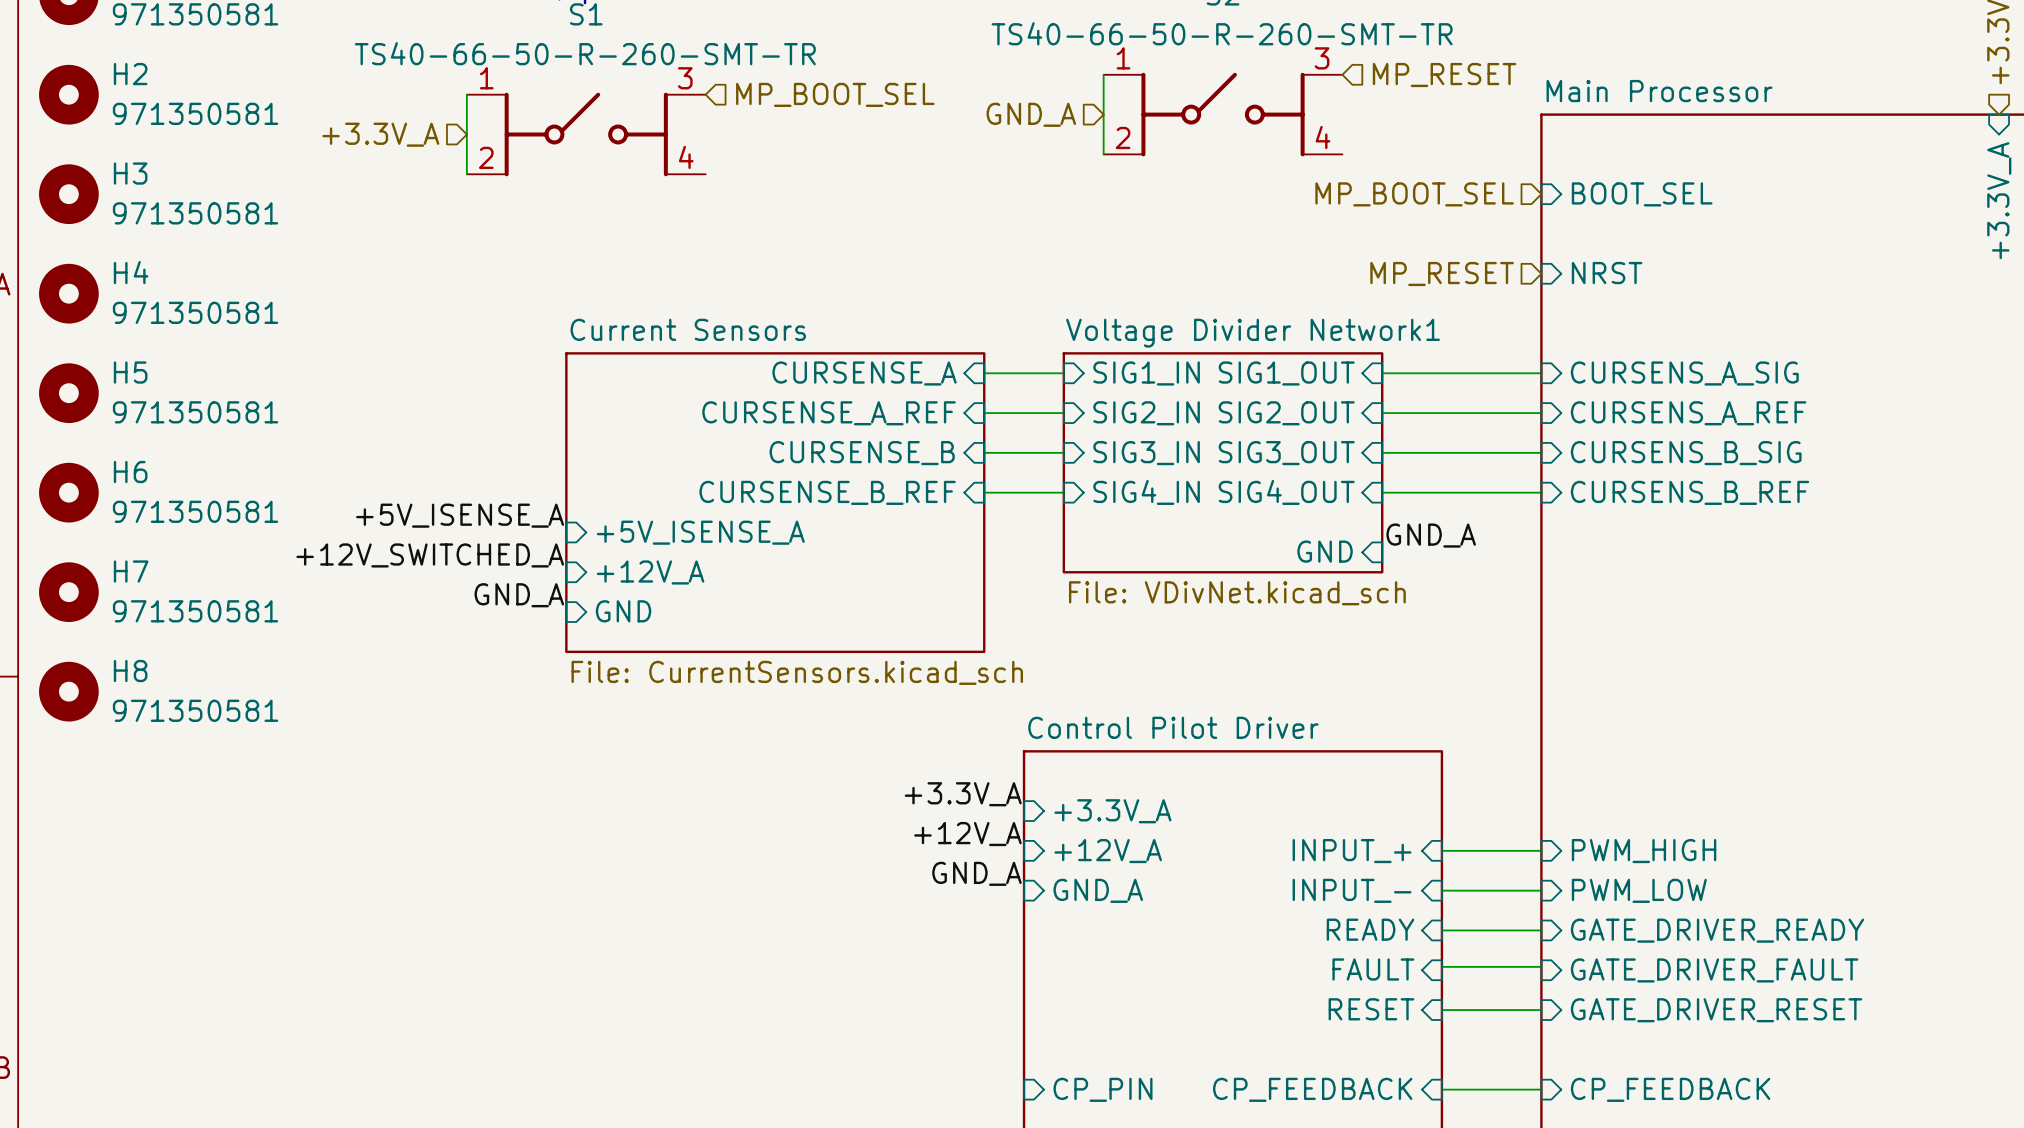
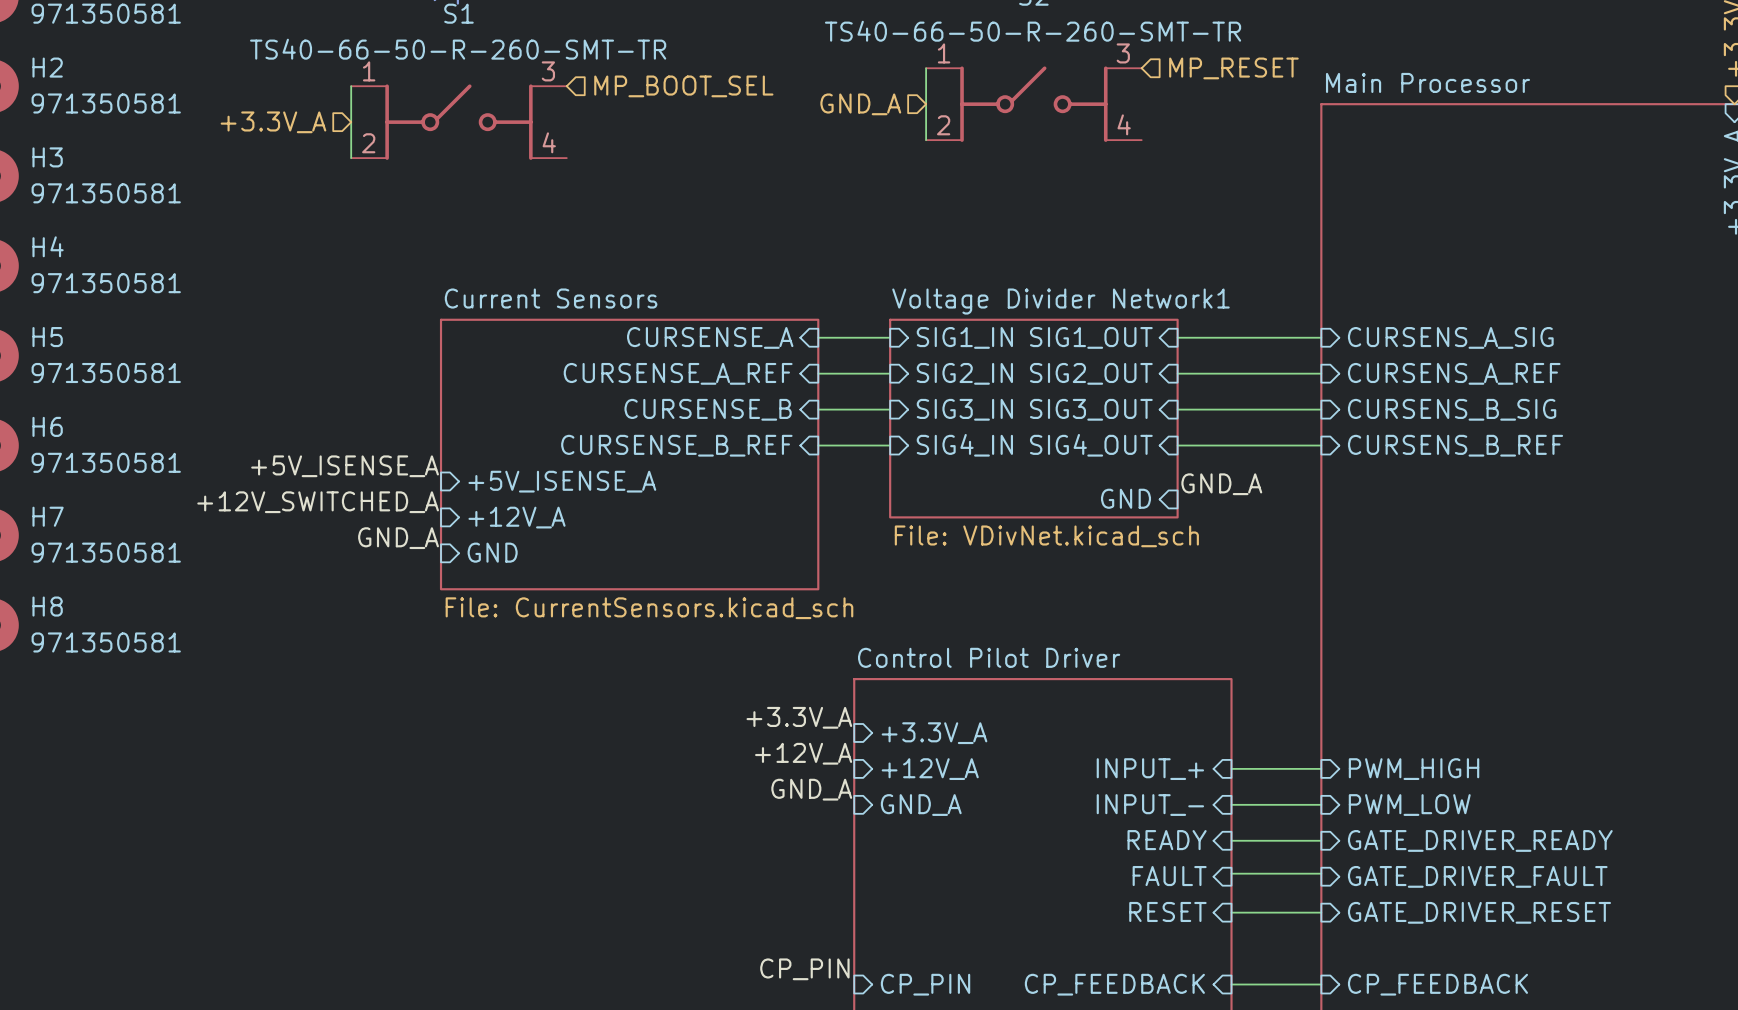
hierarchical label: MP_BOOT_SEL (1414, 194) -> none
sheet pin: BOOT_SEL (1642, 194) -> none
hierarchical label: MP_RESET (1442, 273) -> none
sheet pin: NRST (1607, 273) -> none
label: none -> CP_PIN (804, 969)

